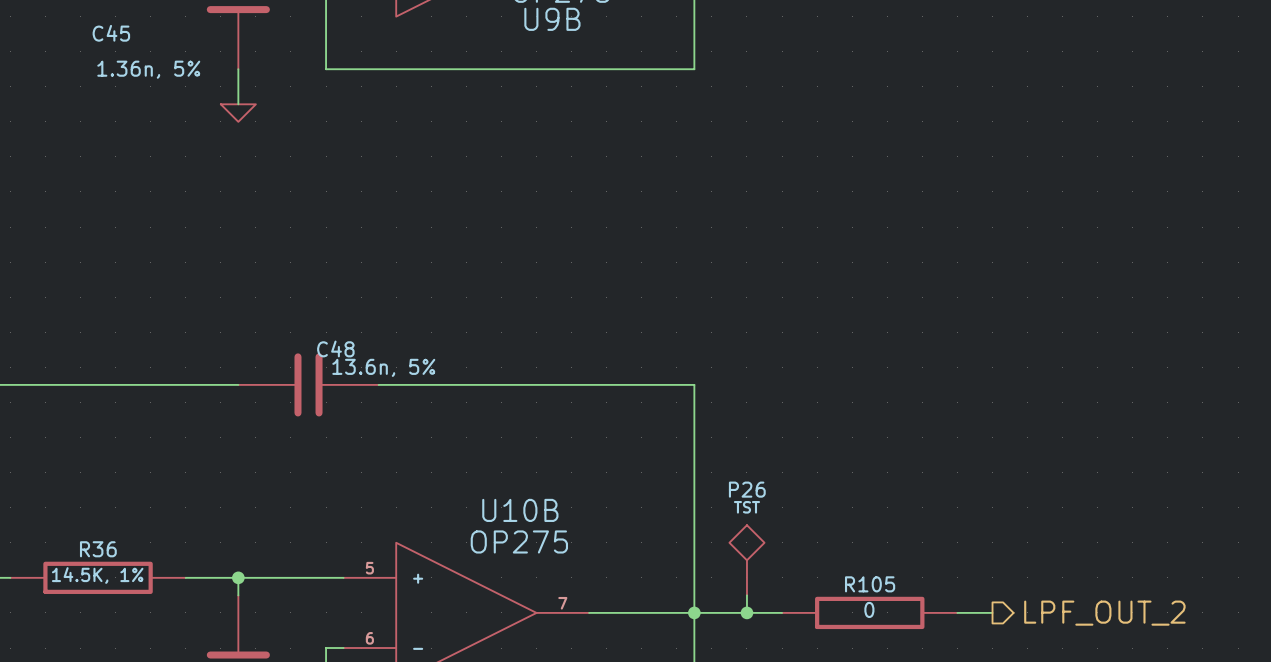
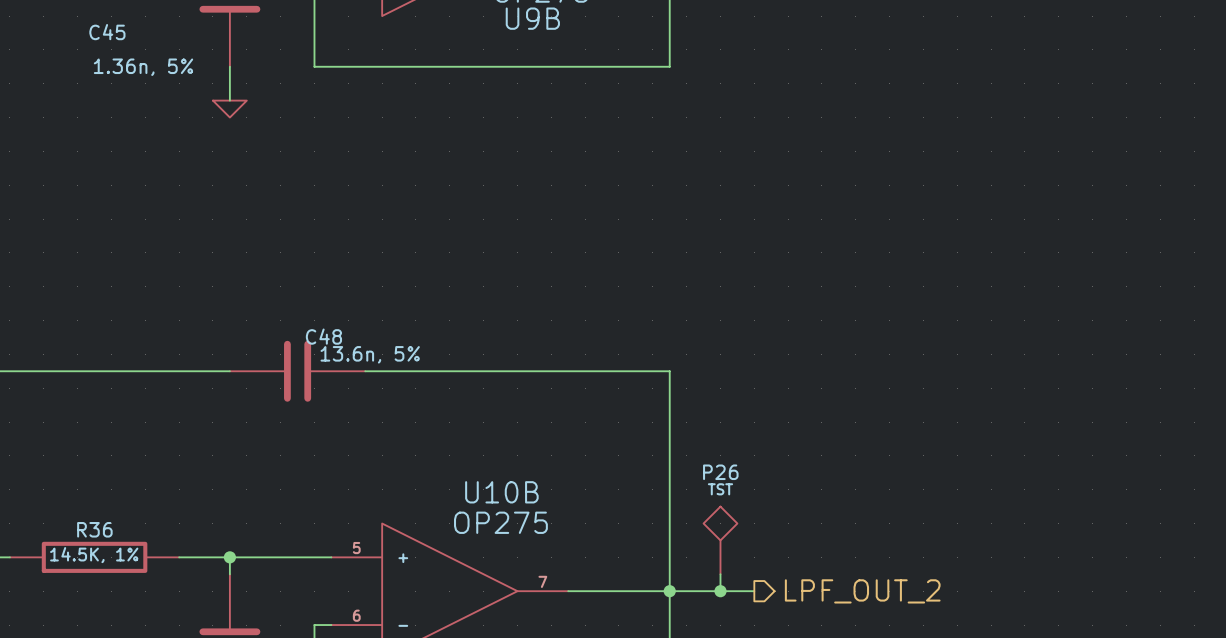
R105: 0 (869, 612) -> none
wire: (957, 612) (992, 612) -> none
hierarchical label position: LPF_OUT_2 (1104, 613) -> LPF_OUT_2 (862, 591)

